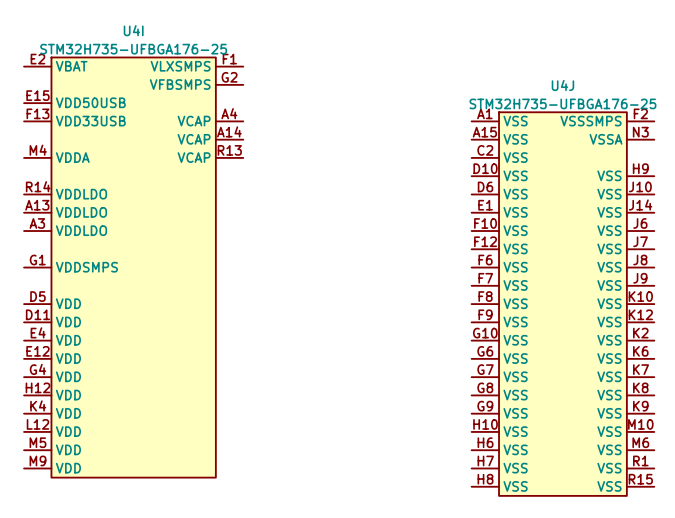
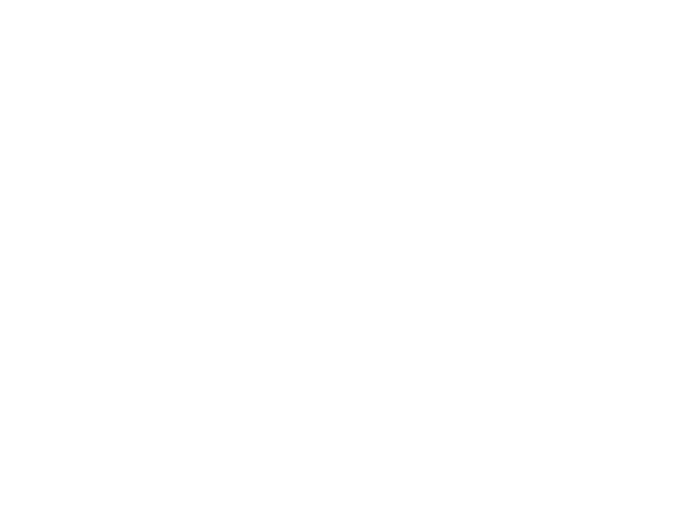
U4I: STM32H735-UFBGA176-25 (133, 267) -> none
U4J: STM32H735-UFBGA176-25 (562, 304) -> none

